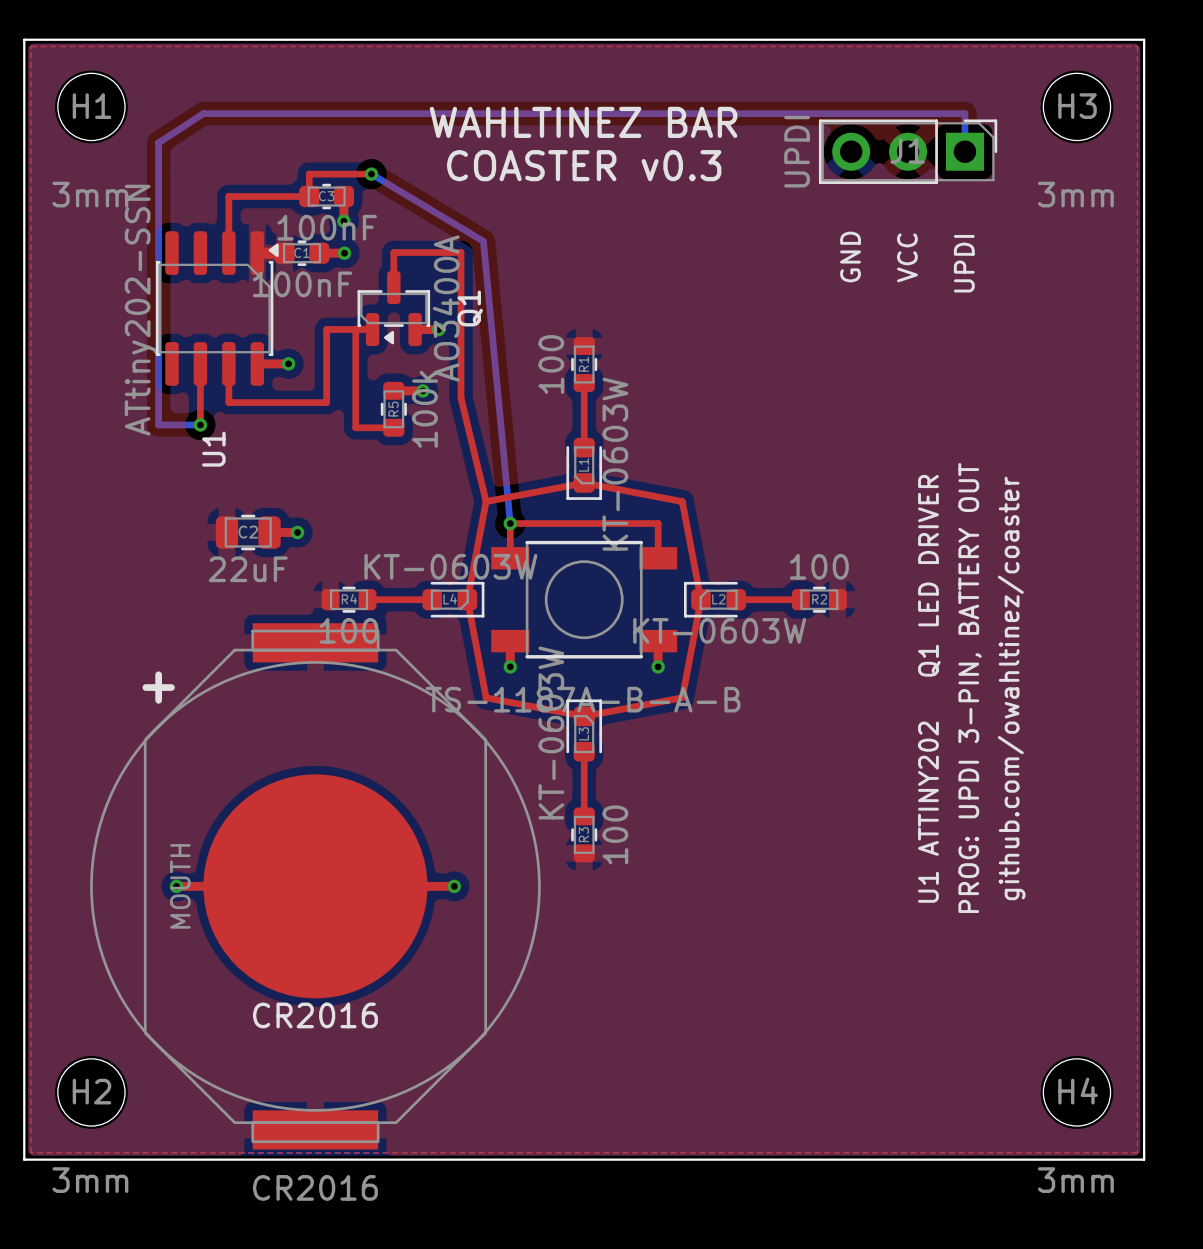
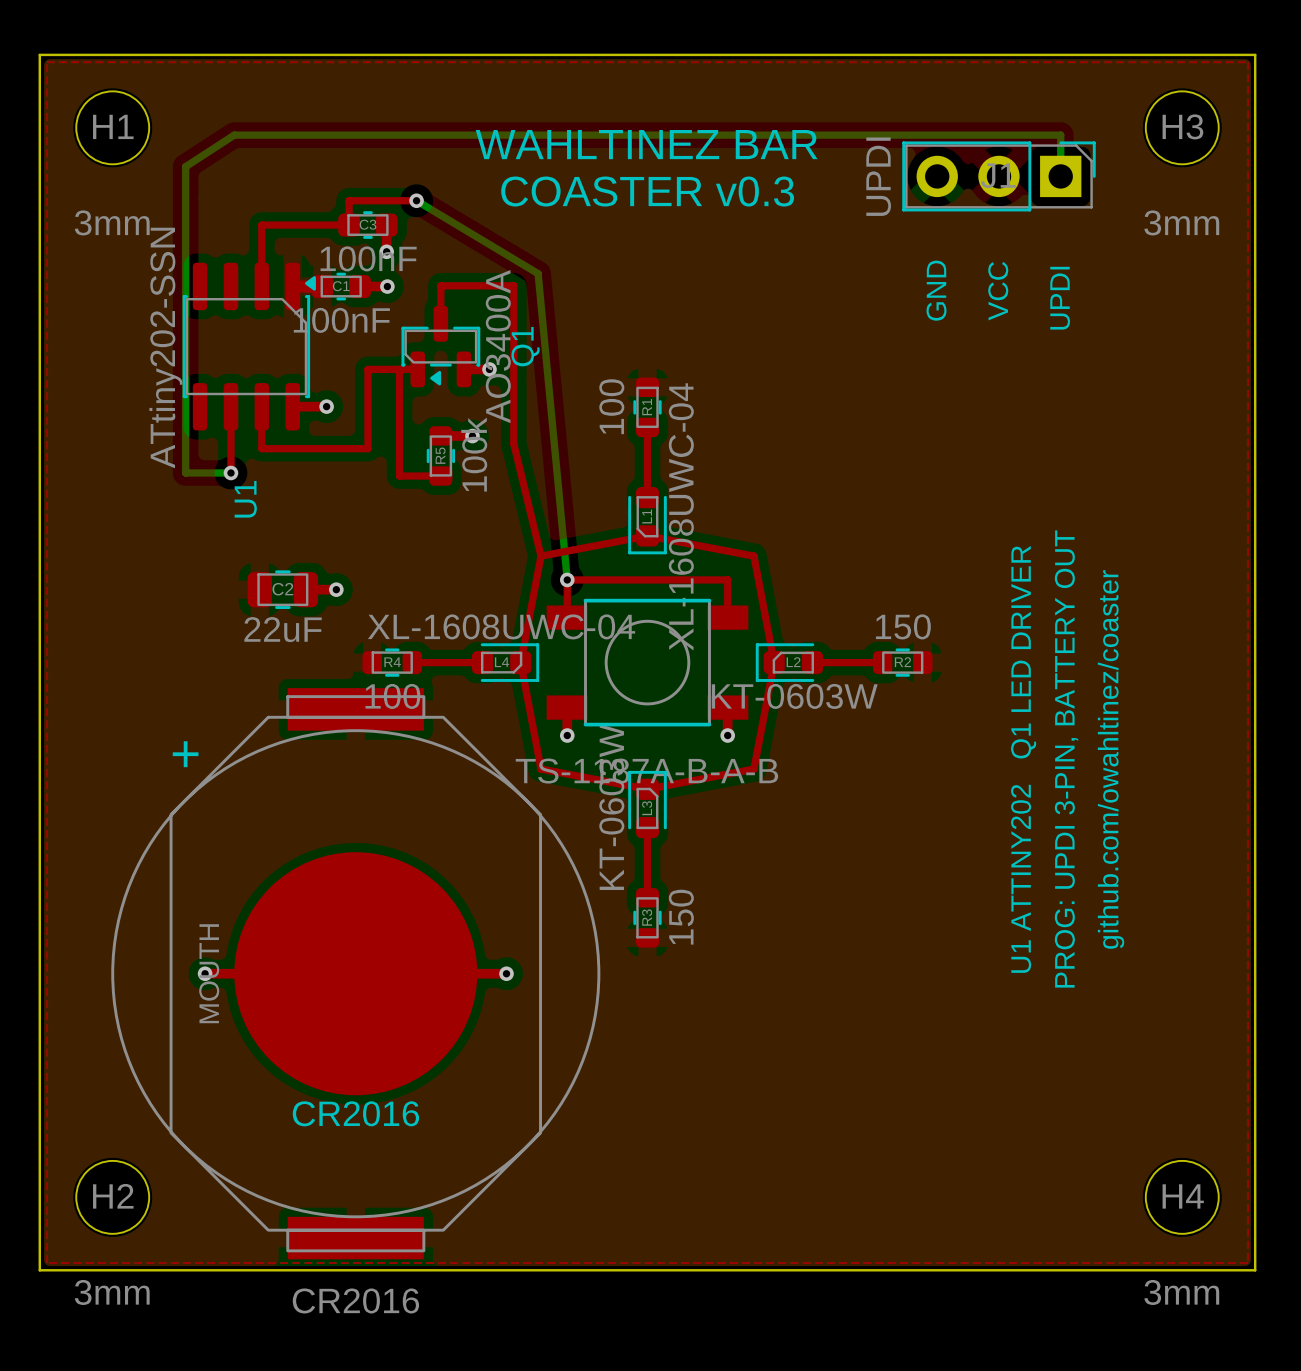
L1 value: KT-0603W (615, 464) -> XL-1608UWC-04 (681, 516)
L4 value: KT-0603W (450, 566) -> XL-1608UWC-04 (501, 626)
R2 value: 100 (819, 566) -> 150 (903, 626)
R3 value: 100 (615, 834) -> 150 (681, 917)

